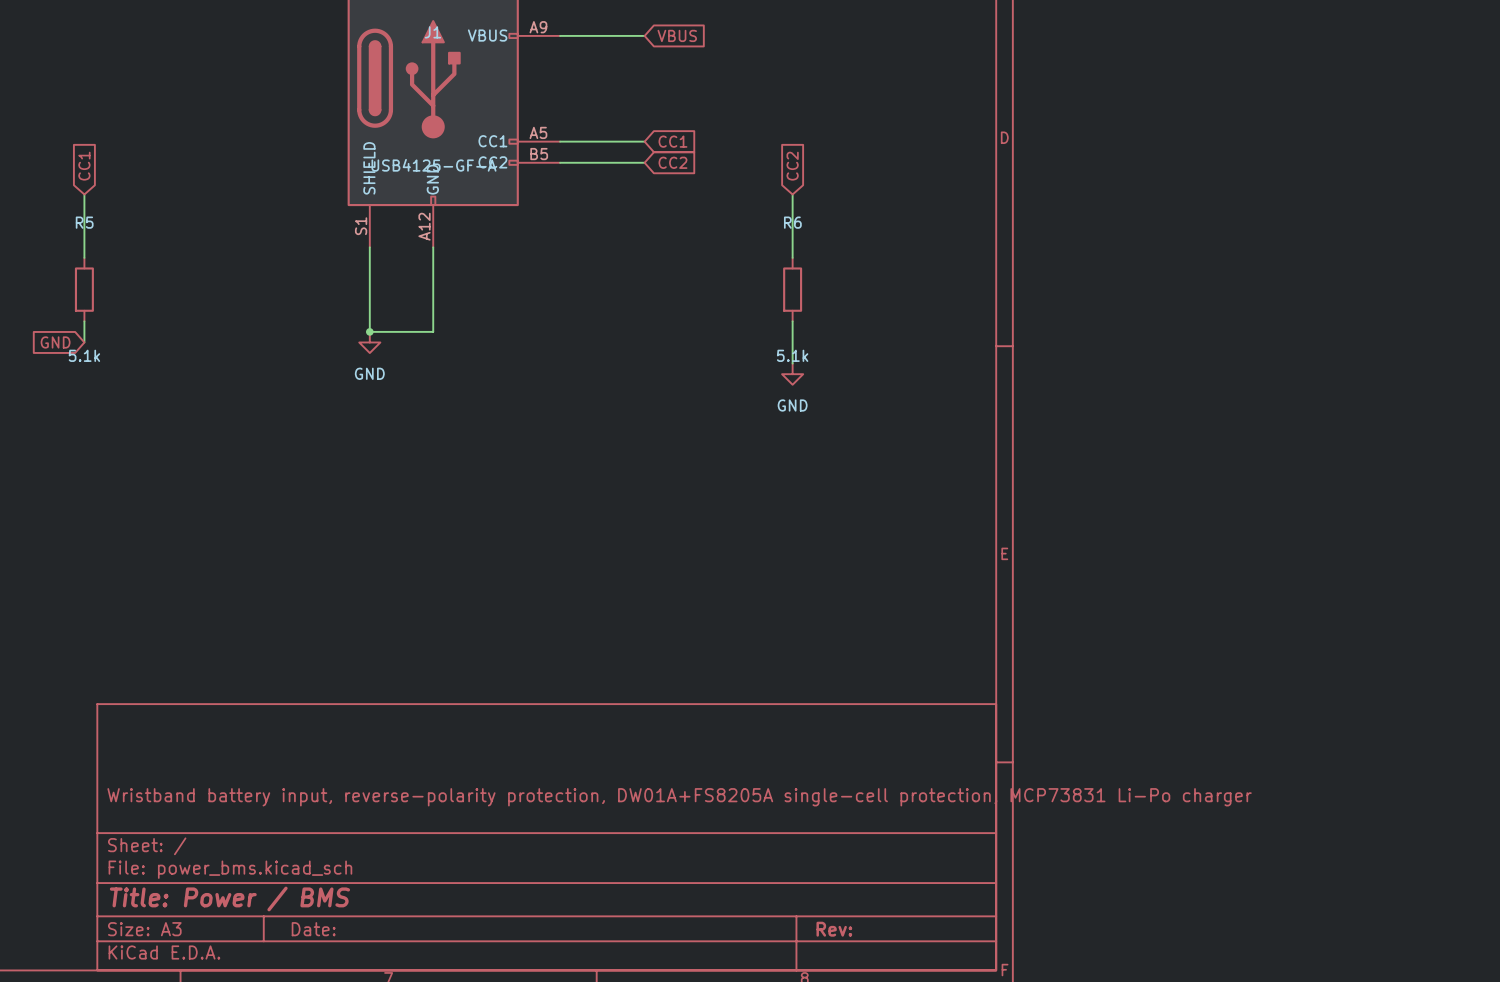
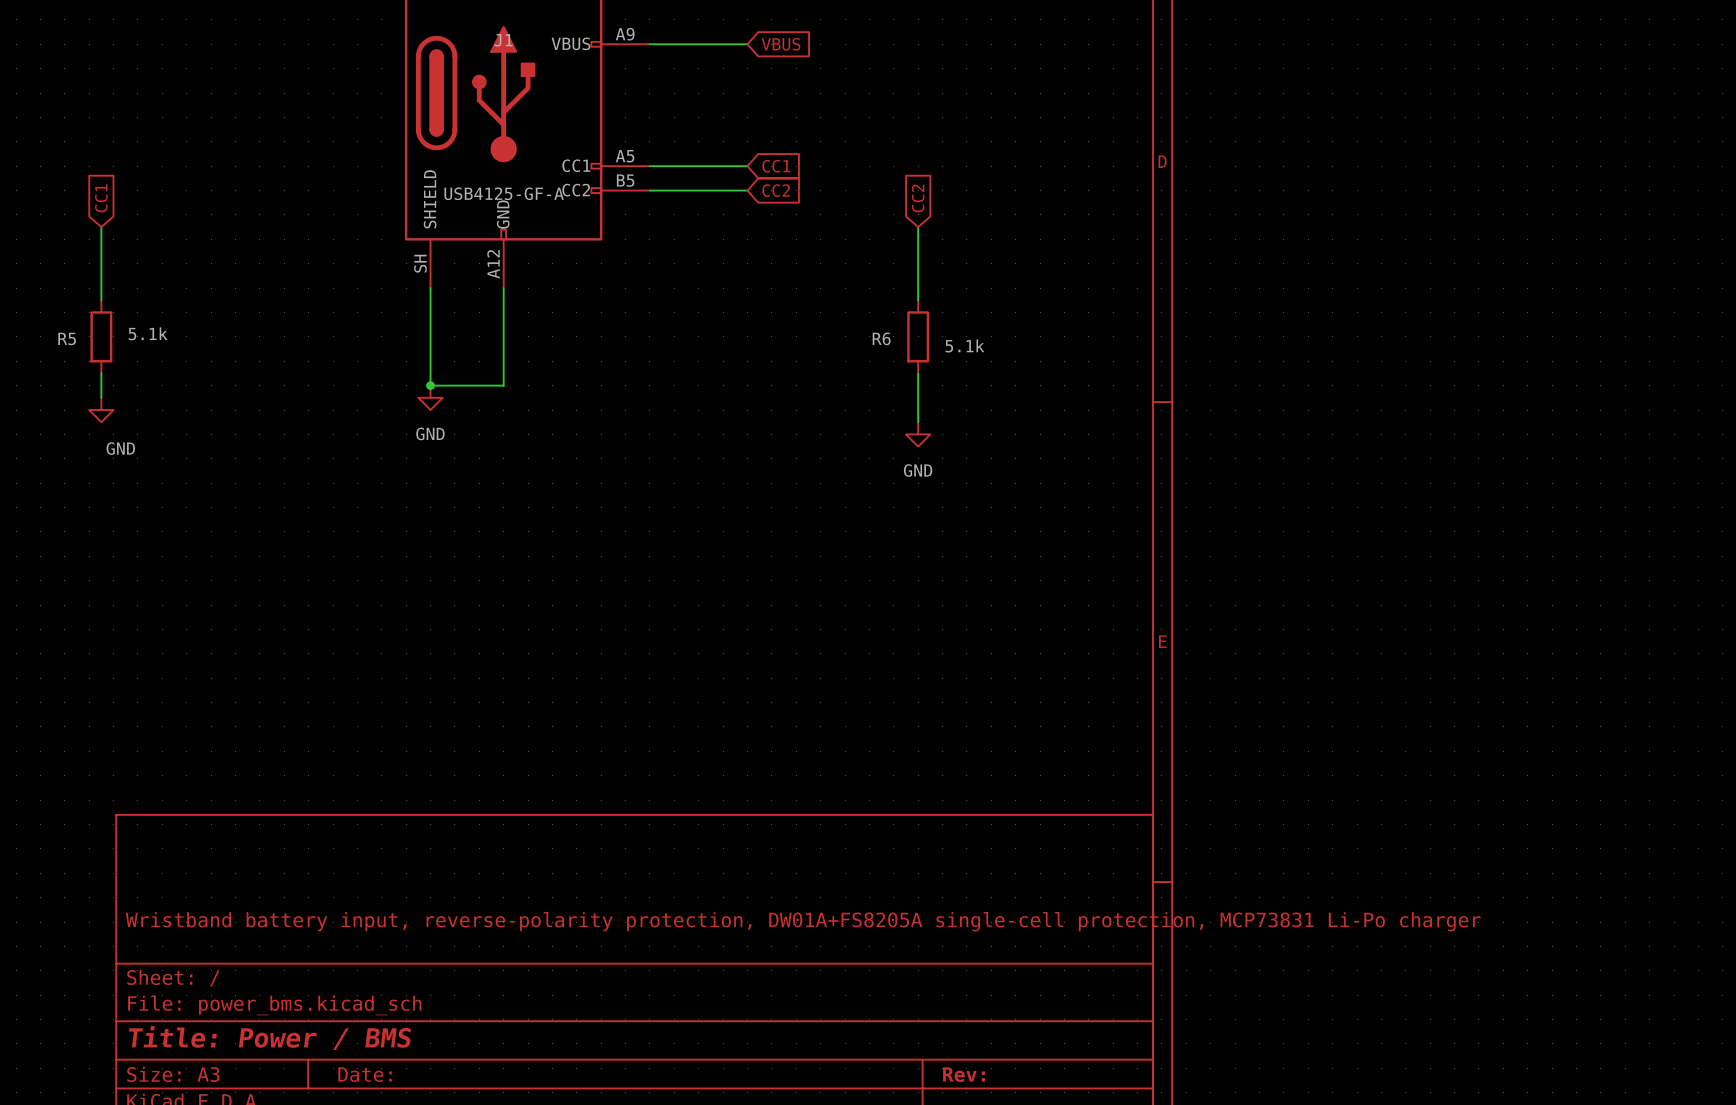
R5 name position: R5 (84, 222) -> R5 (67, 338)
R6 name position: R6 (792, 222) -> R6 (881, 338)
J1 pin number: S1 (361, 226) -> SH (420, 263)
global label: GND (55, 342) -> none
power symbol: none -> GND (101, 410)
R5 value position: 5.1k (84, 355) -> 5.1k (148, 333)
R6 value position: 5.1k (792, 355) -> 5.1k (964, 346)

